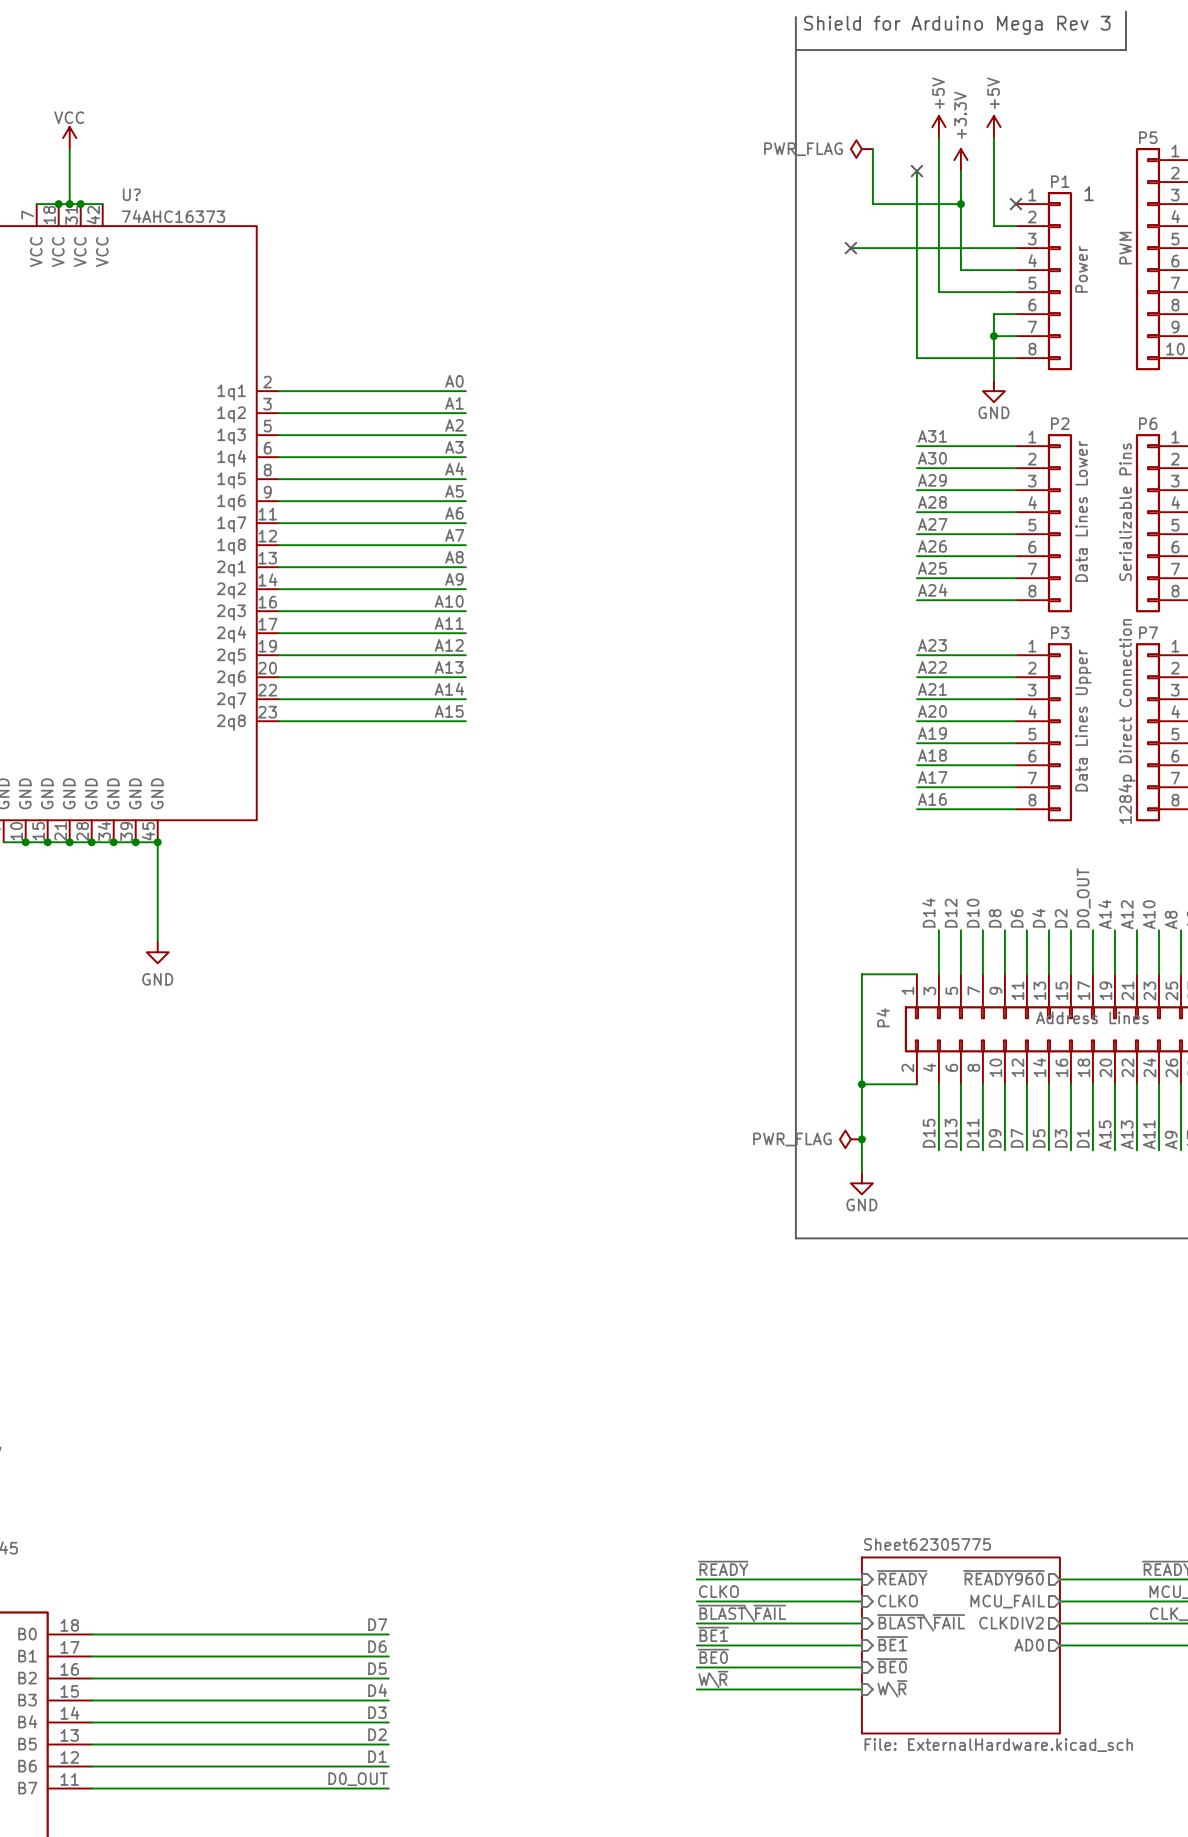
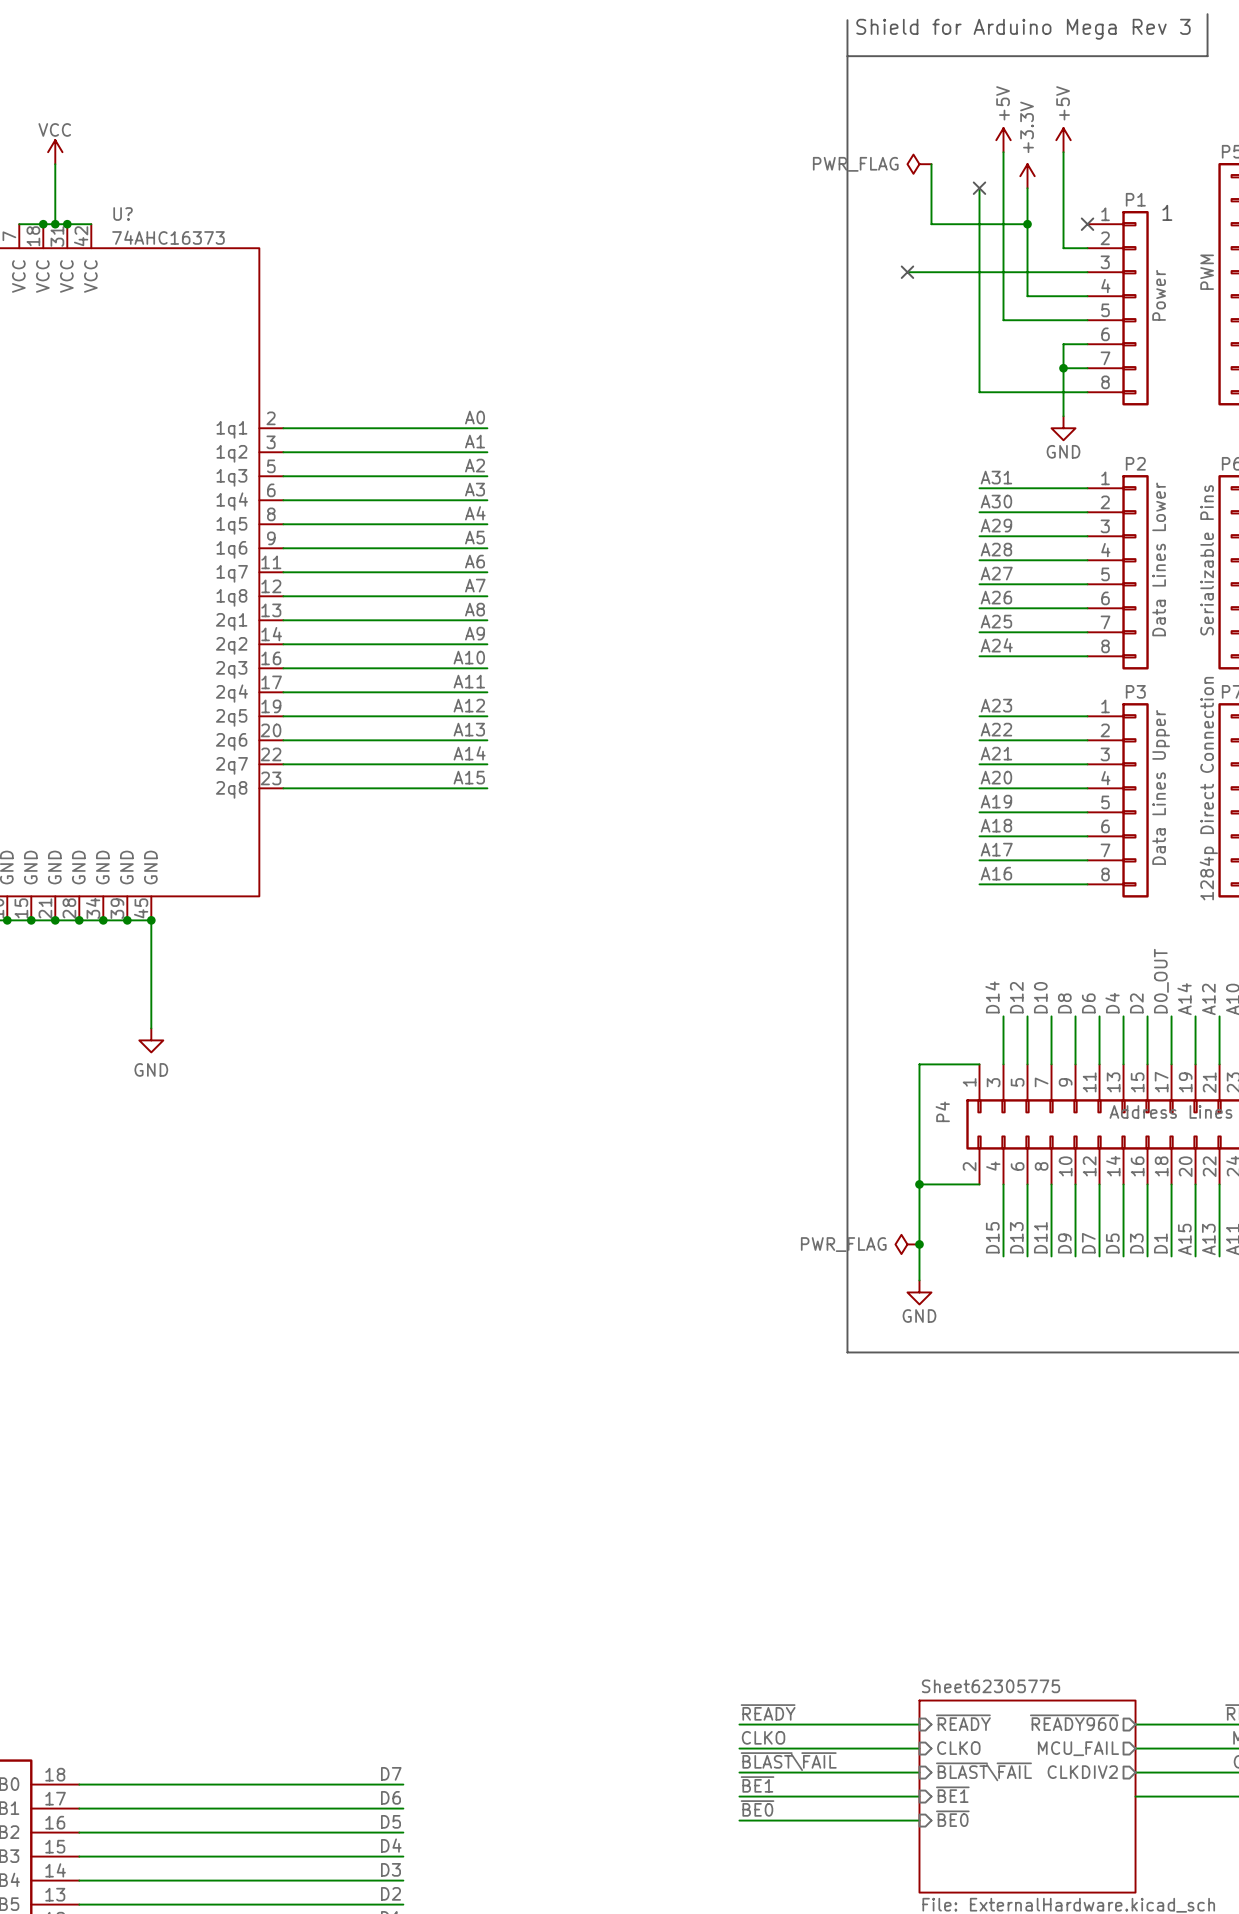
sheet pin: AD0 (1029, 1645) -> none
label: W\~{R} (713, 1679) -> none
sheet pin: W\~{R} (892, 1688) -> none
wire: (696, 1689) (861, 1689) -> none

